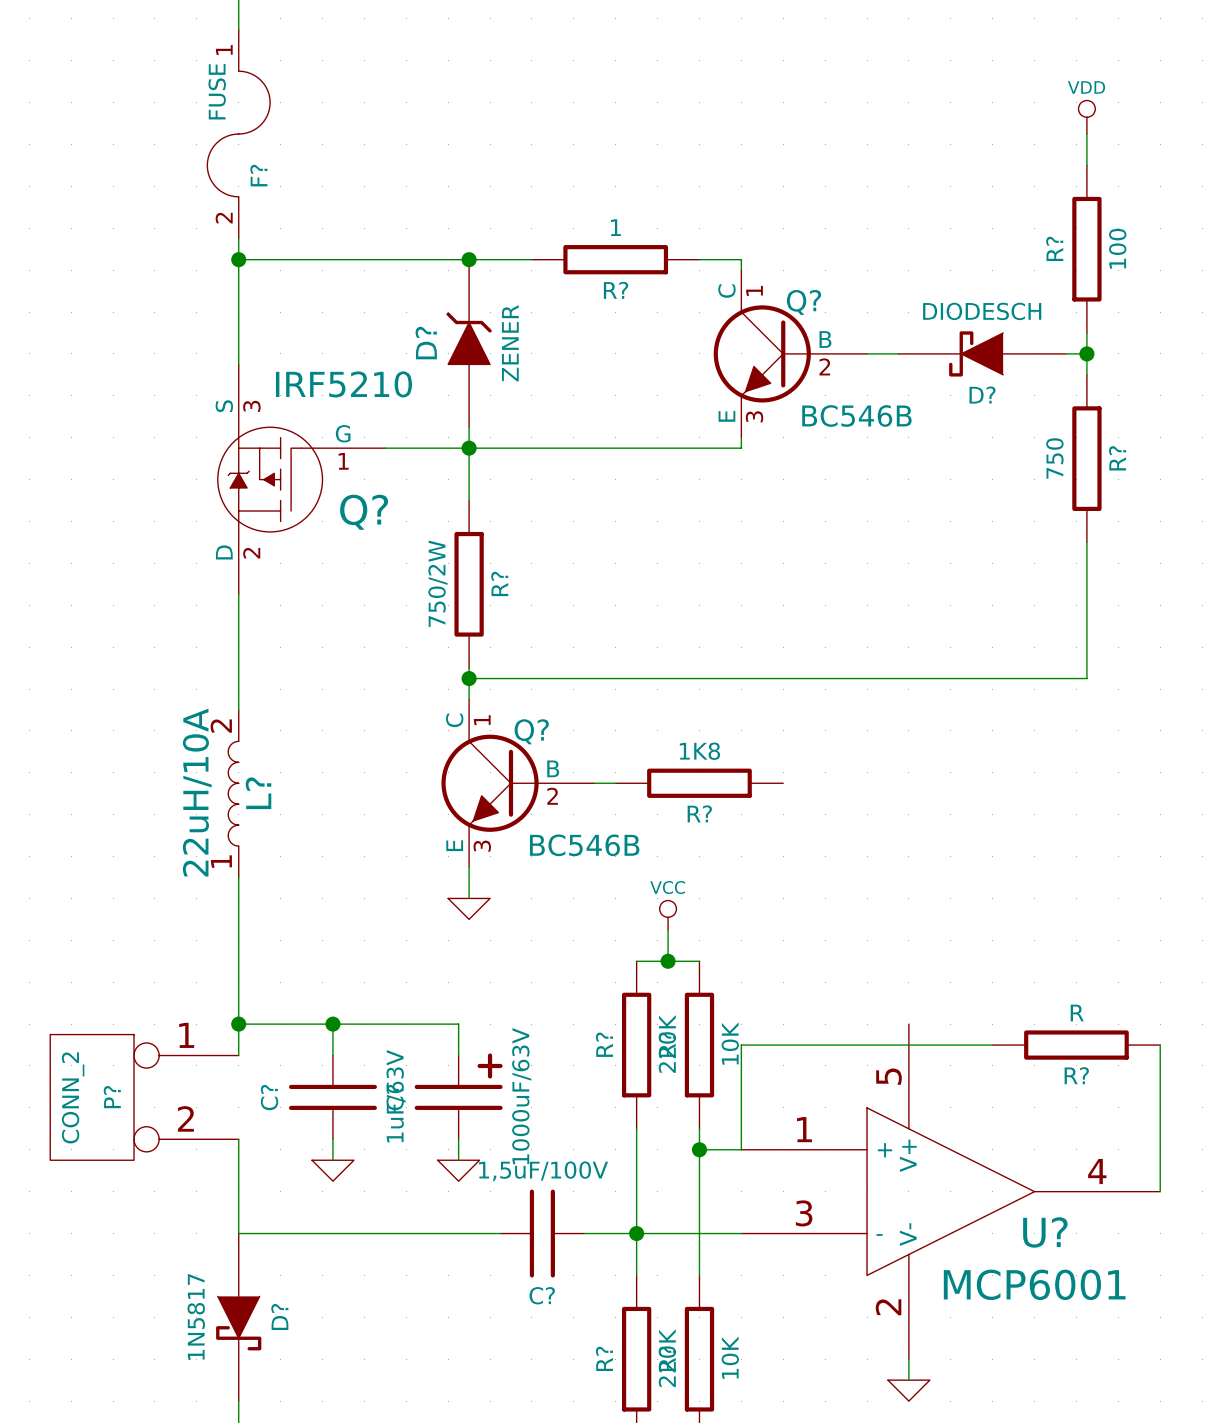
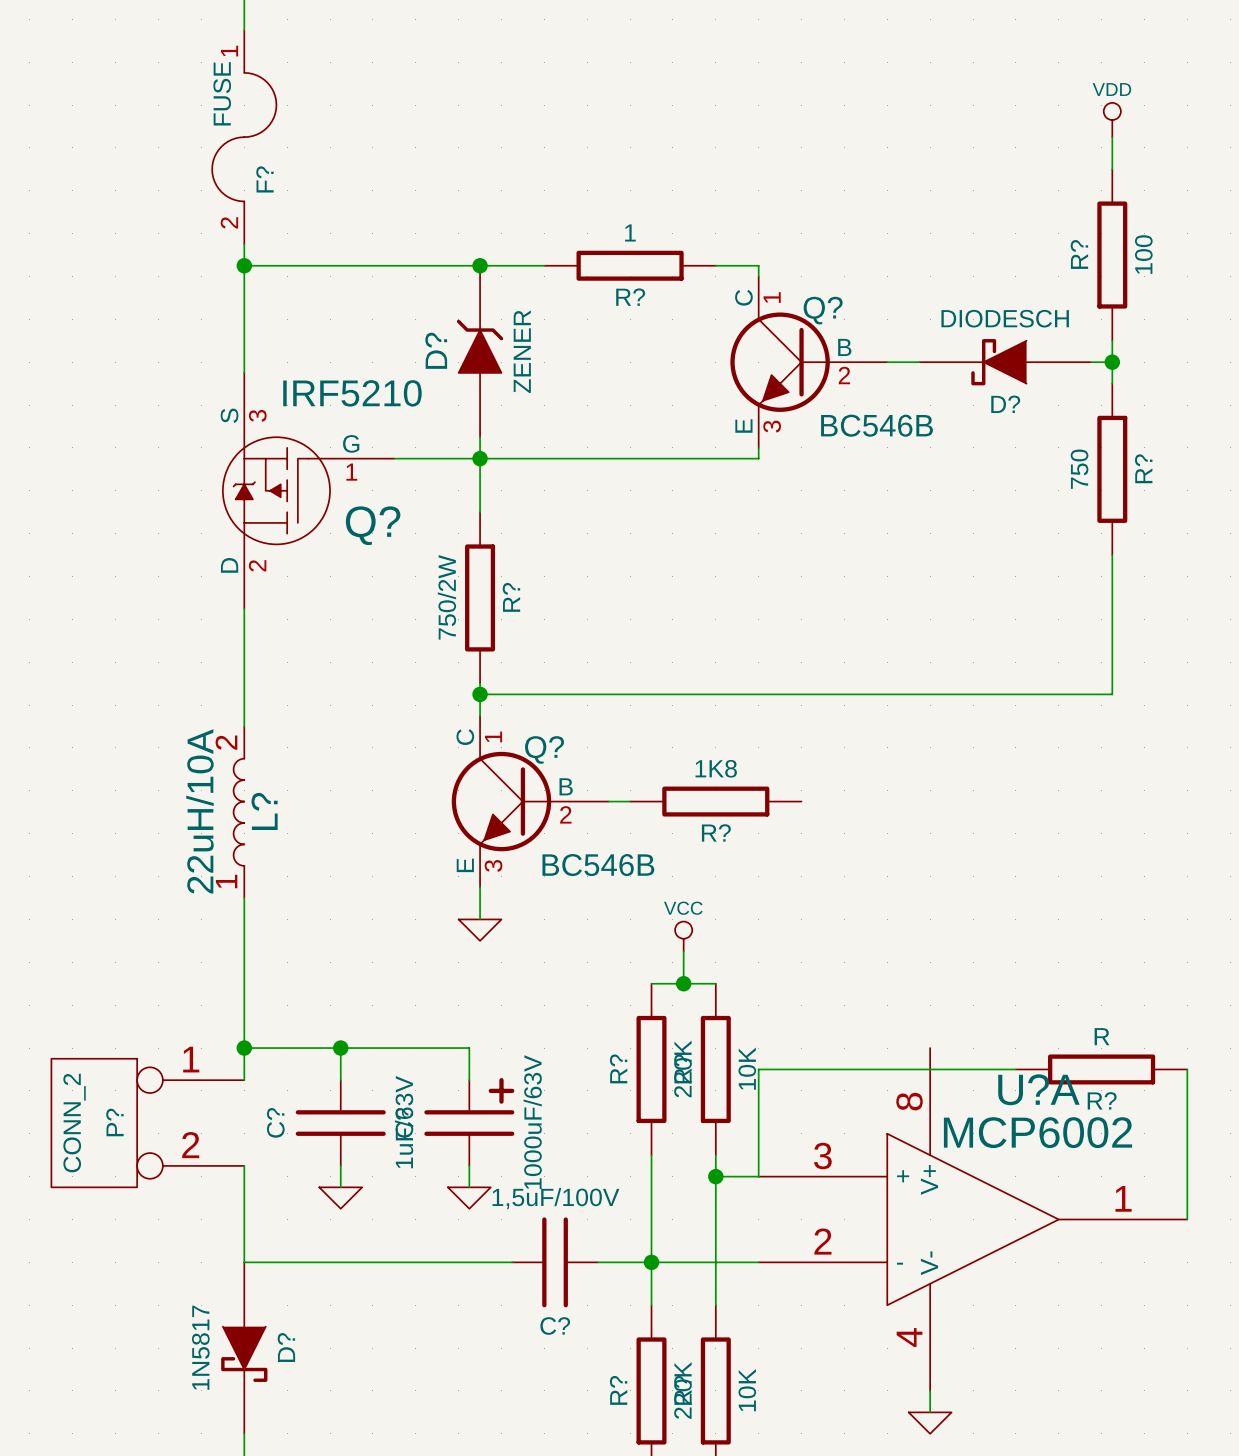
U? pin number: 5 (889, 1076) -> 8 (909, 1101)
U? pin number: 1 (804, 1129) -> 3 (822, 1156)
U? pin number: 4 (1097, 1171) -> 1 (1123, 1198)
U? pin number: 3 (804, 1213) -> 2 (822, 1241)
U? name: U? (1045, 1232) -> U?A (1038, 1089)
U? value: MCP6001 (1034, 1284) -> MCP6002 (1037, 1132)
U? pin number: 2 (888, 1307) -> 4 (909, 1337)

